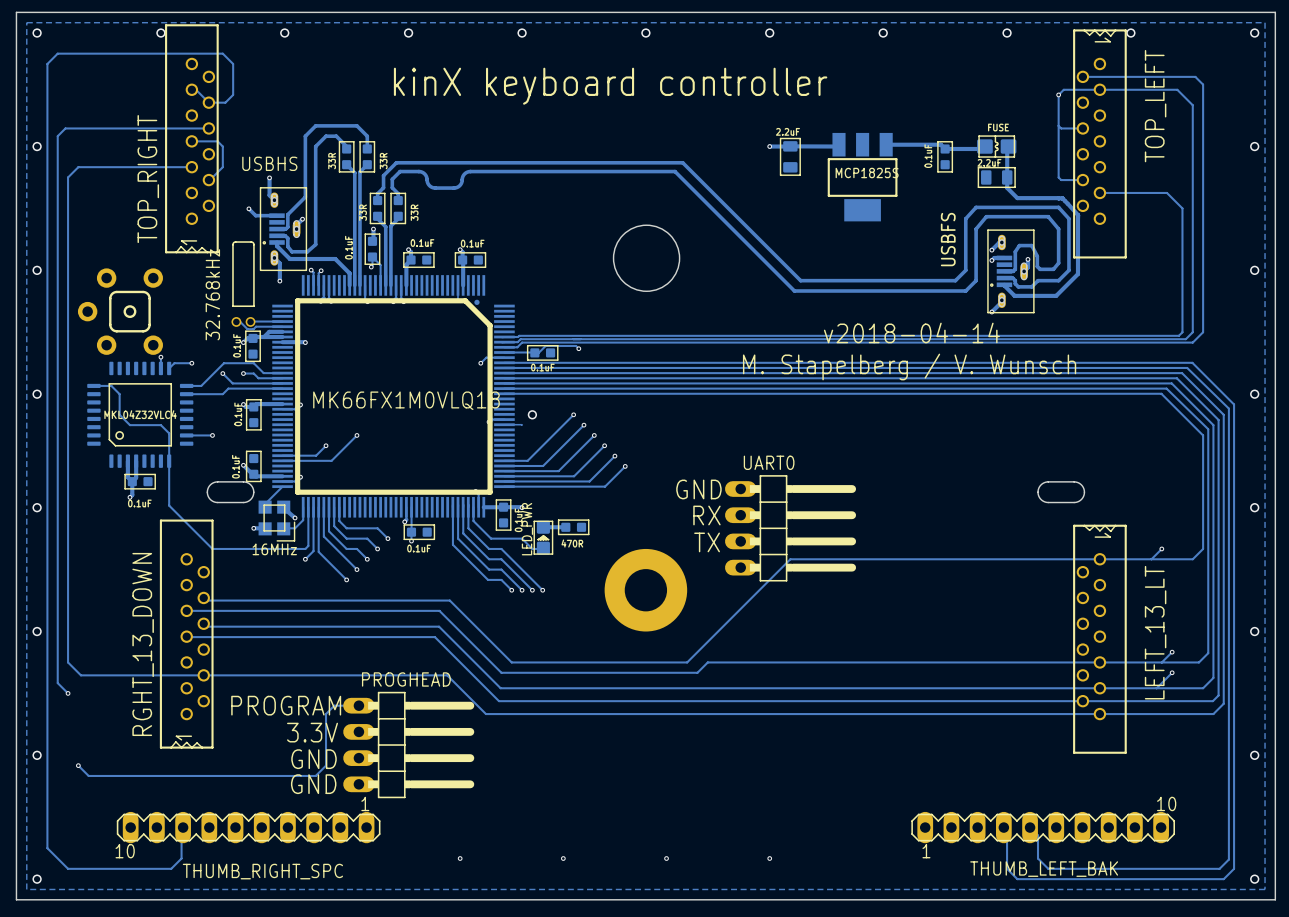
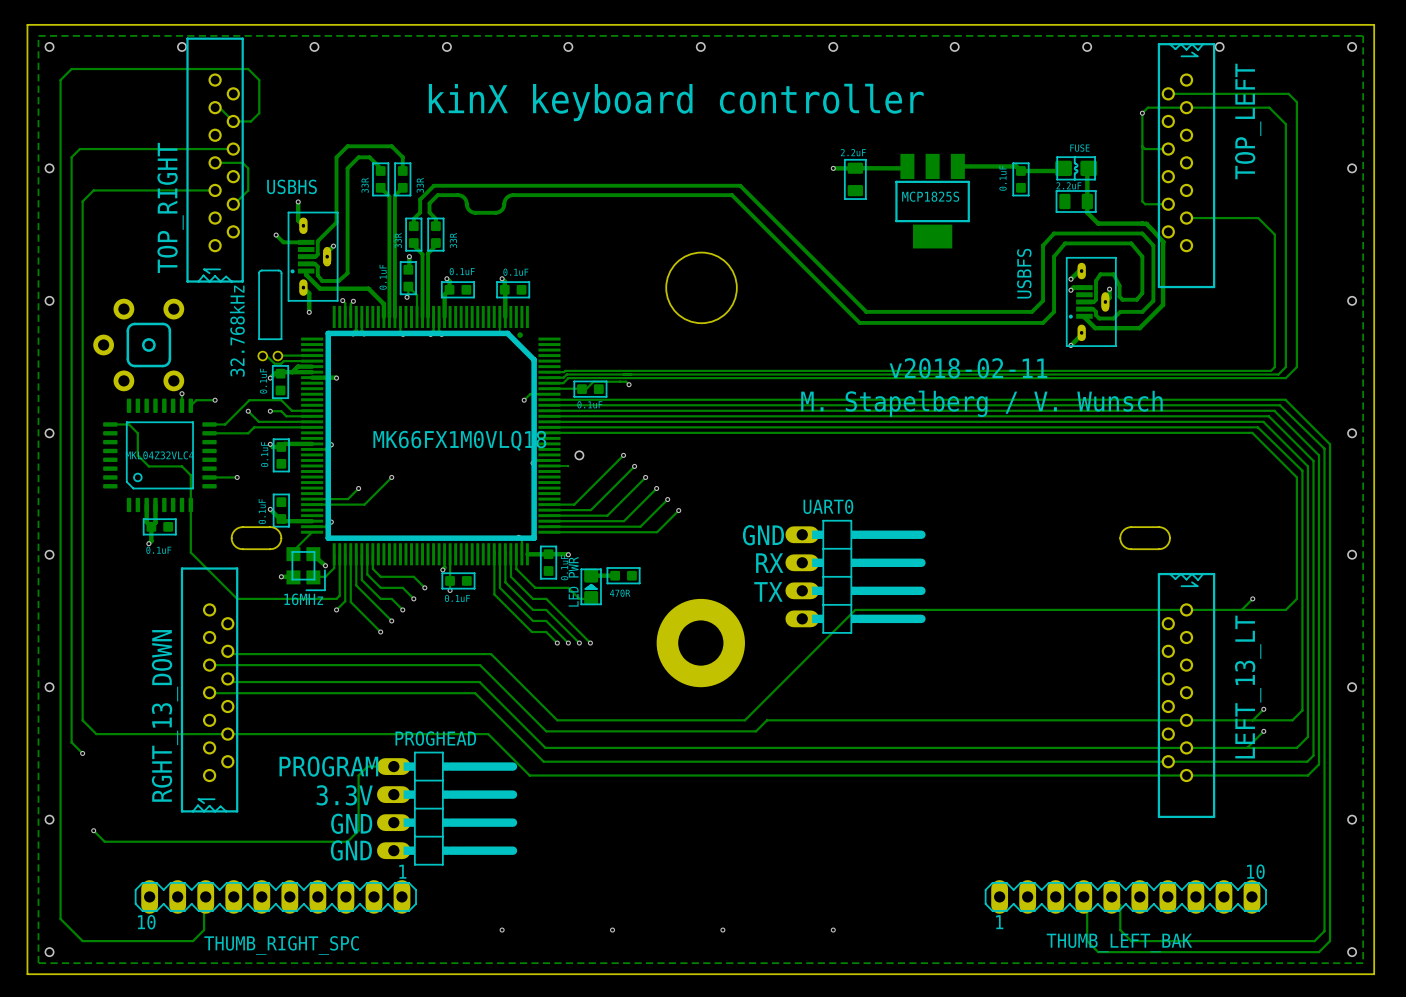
text: v2018-04-14 (911, 332) -> v2018-02-11 (968, 368)

